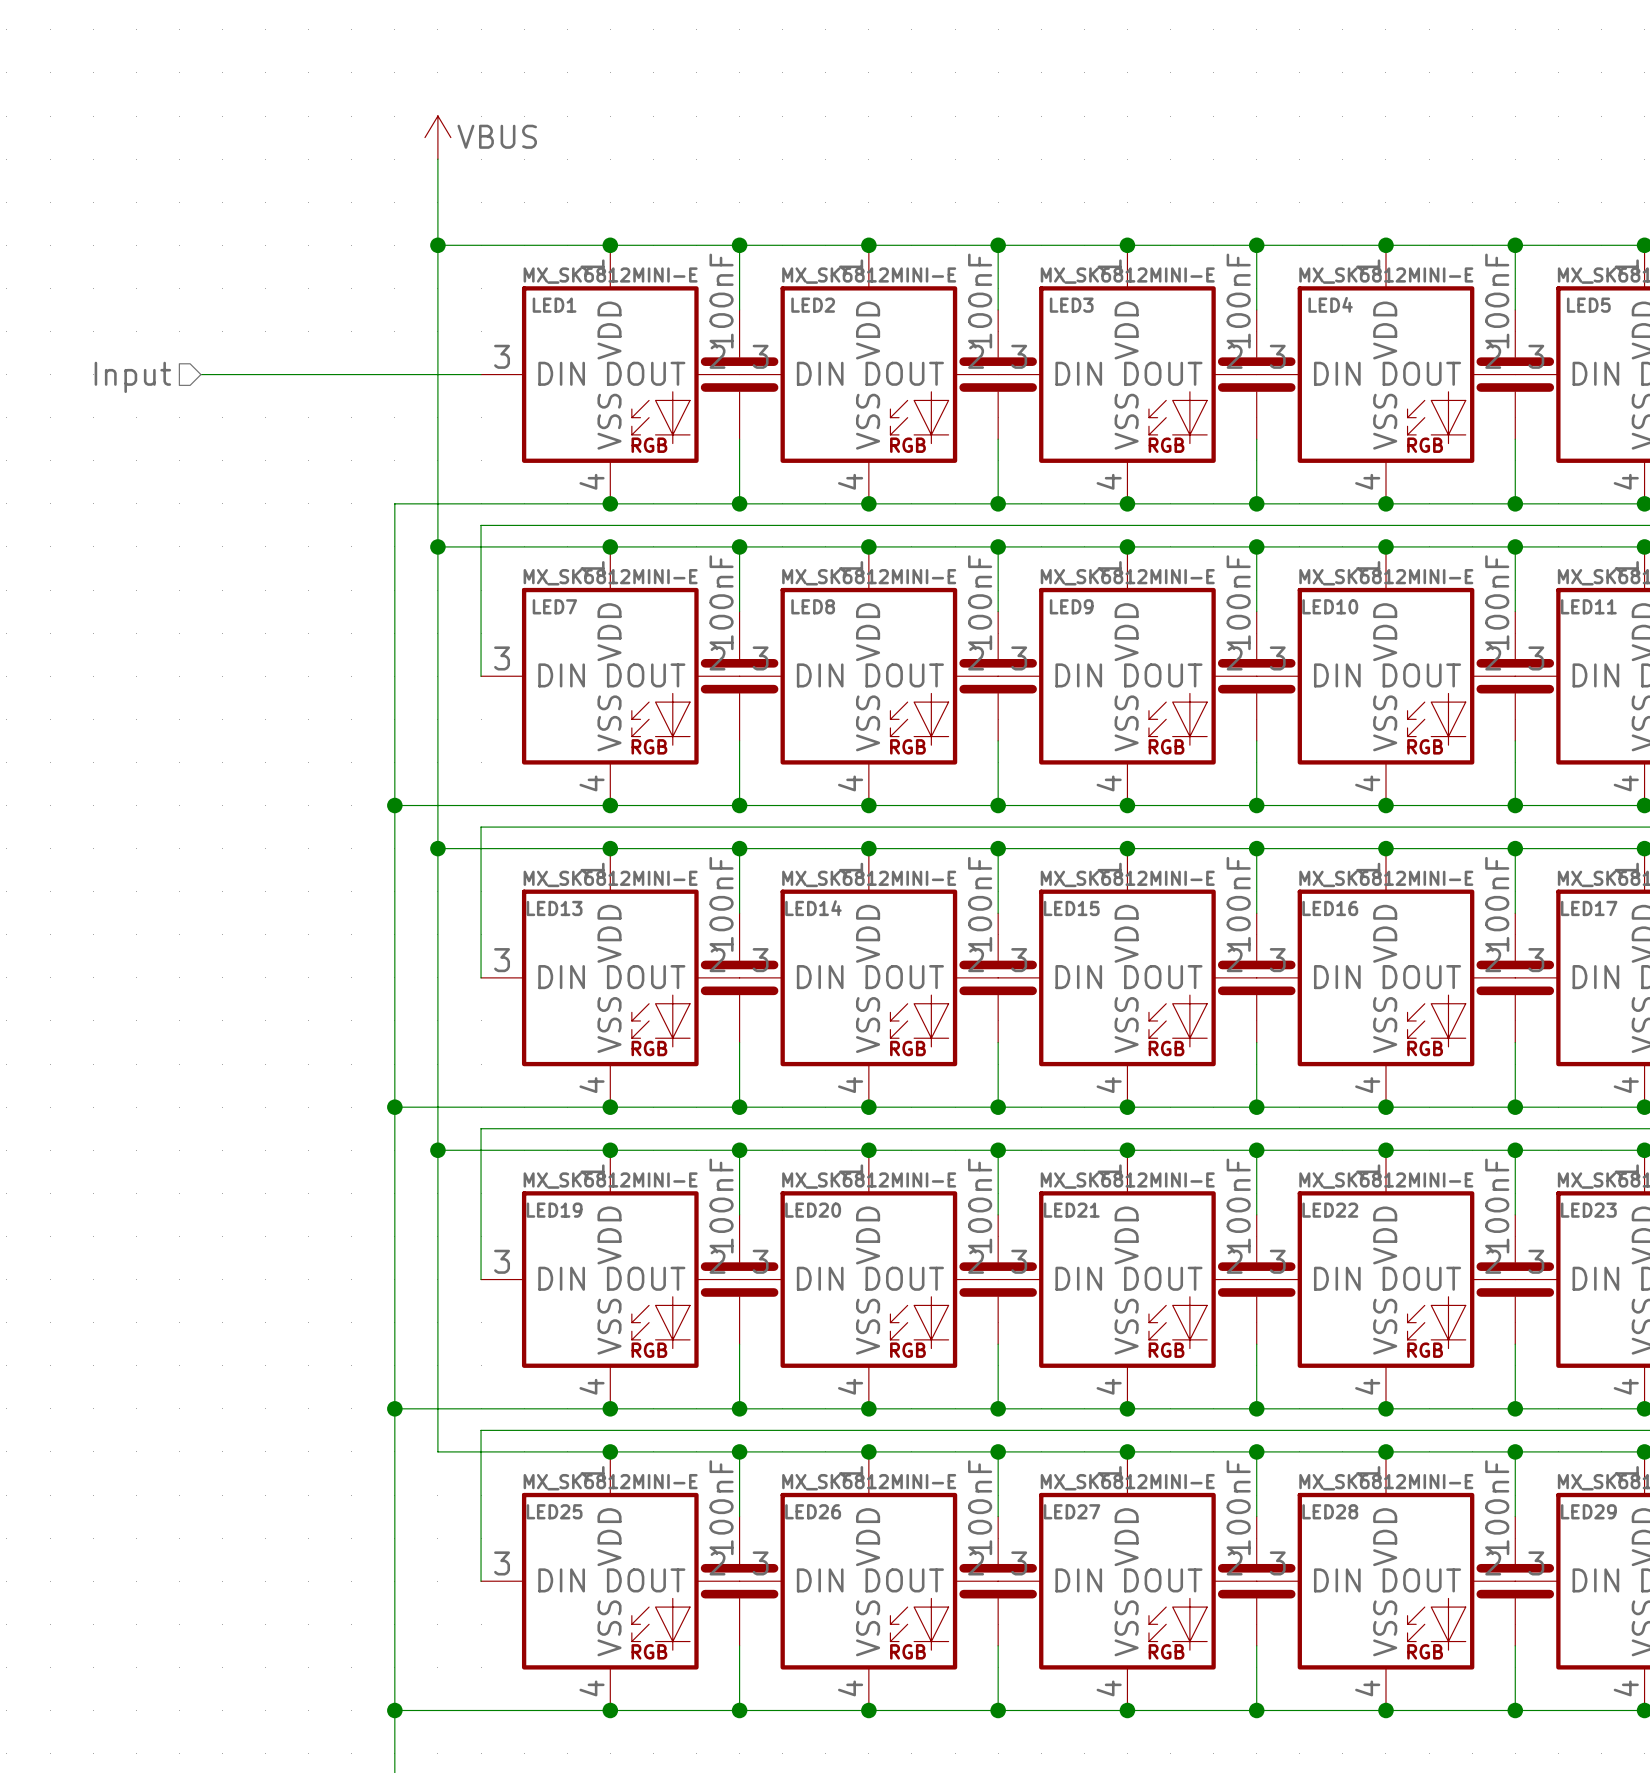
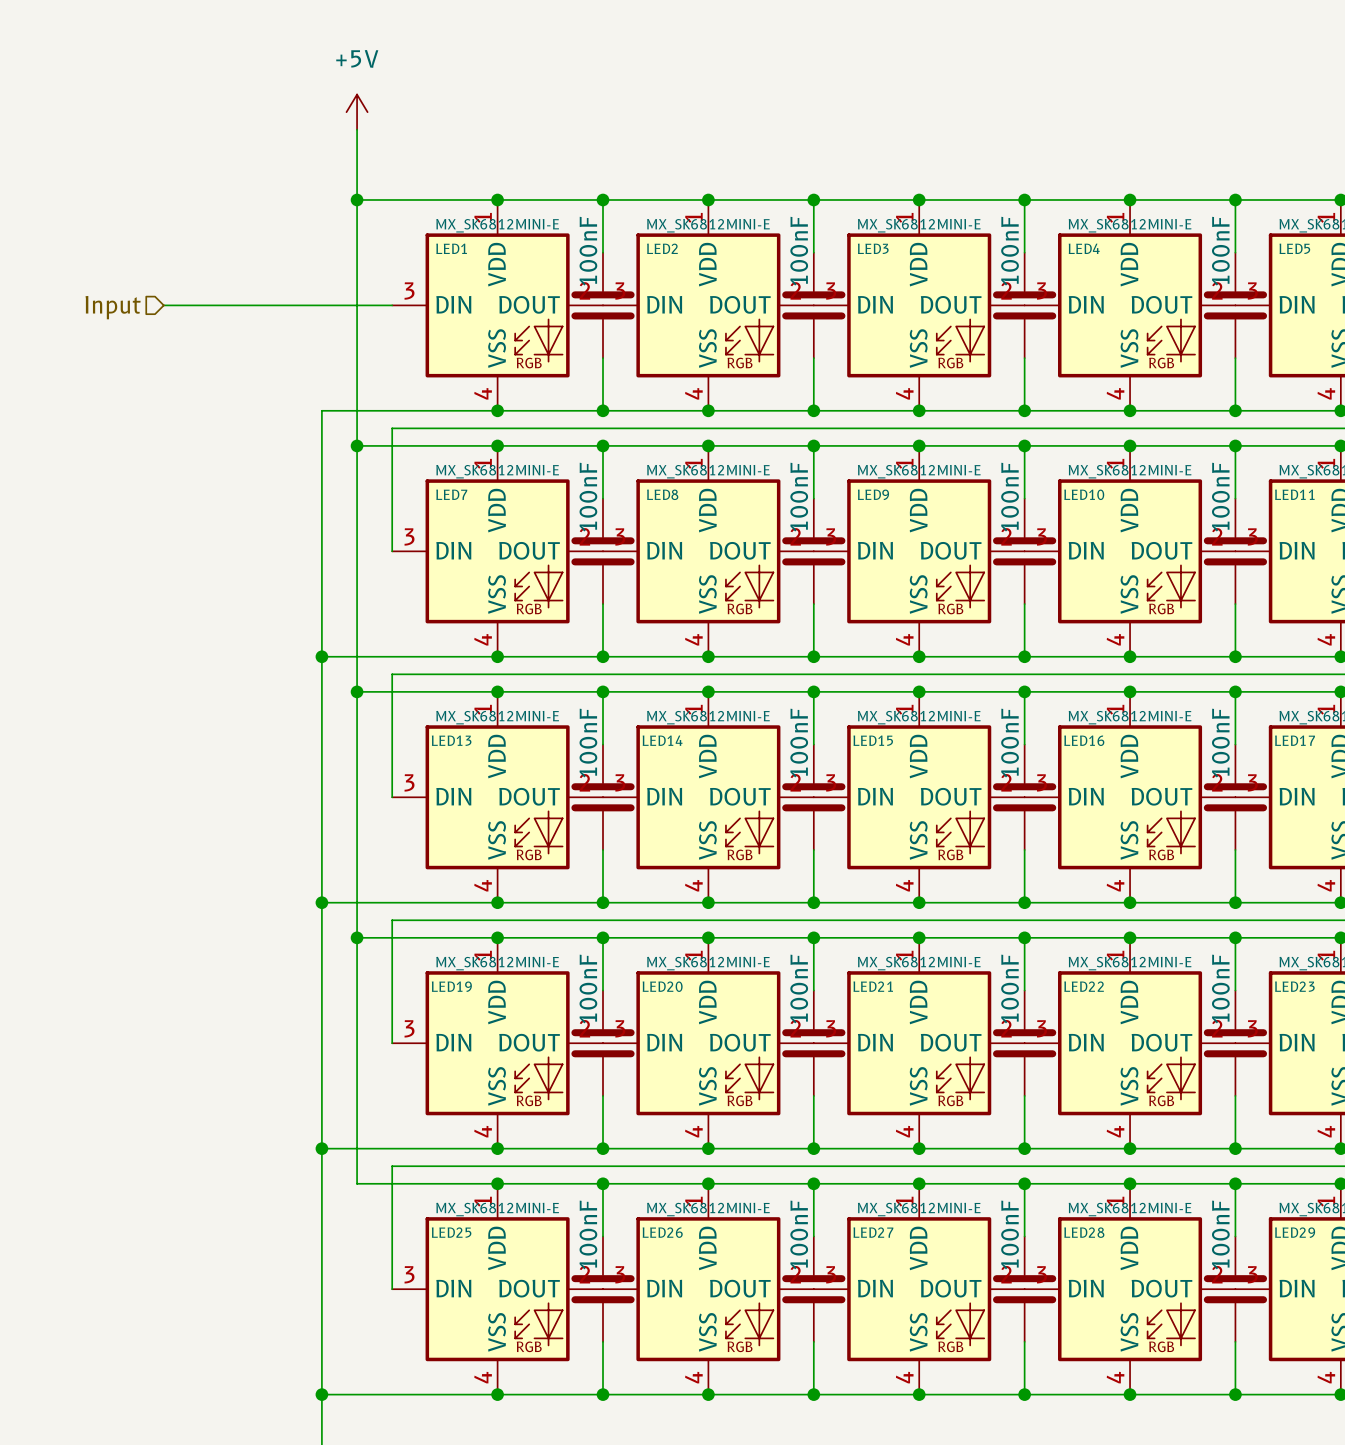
power symbol: VBUS (437, 137) -> +5V (357, 112)

